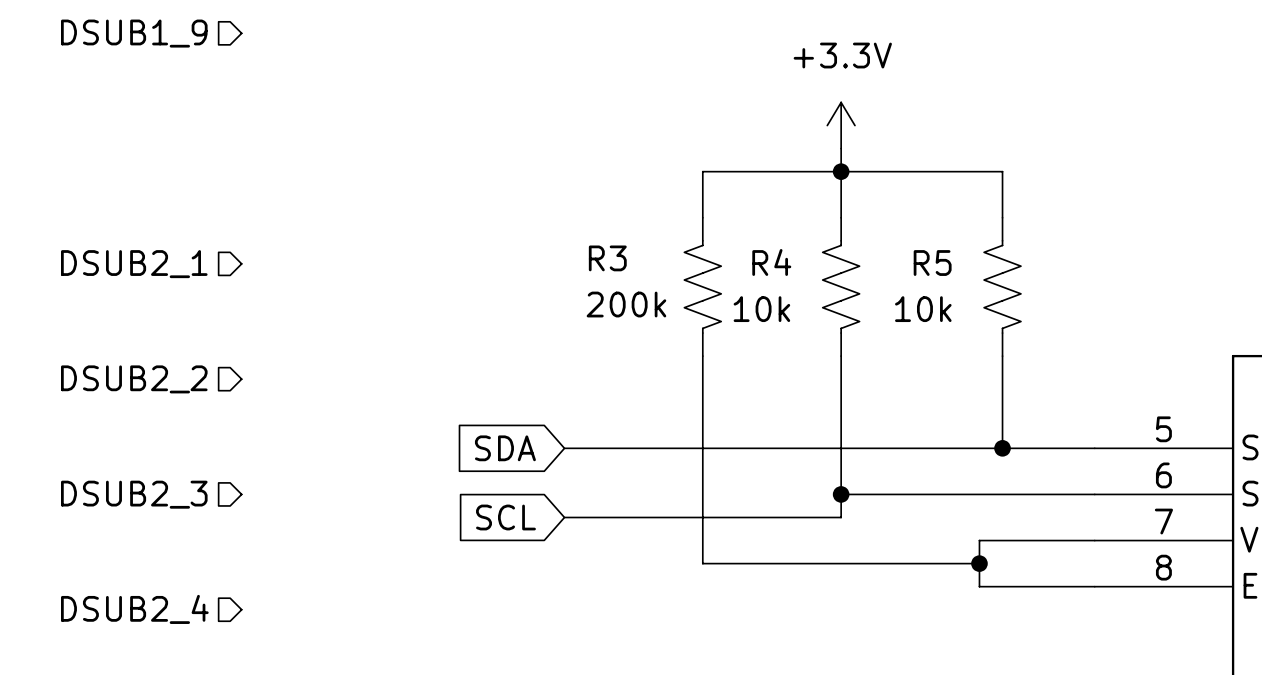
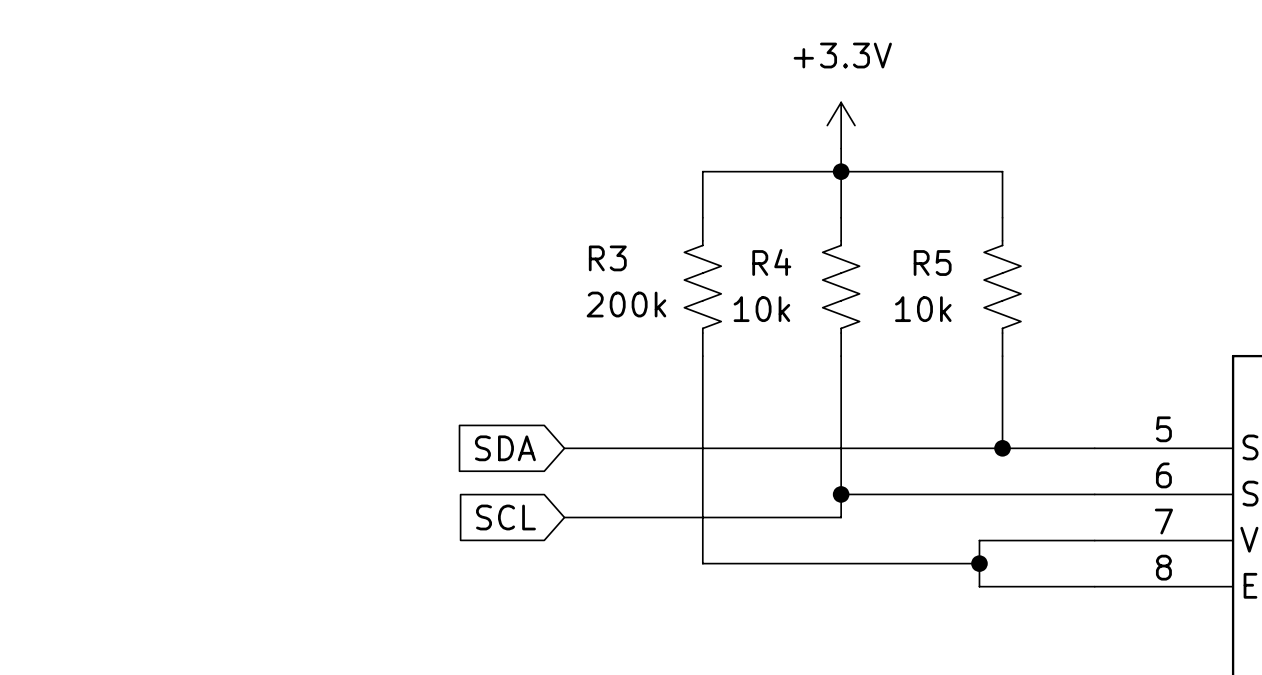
hierarchical label: DSUB1_9 (134, 33) -> none
hierarchical label: DSUB2_1 (134, 264) -> none
hierarchical label: DSUB2_2 (134, 379) -> none
hierarchical label: DSUB2_3 (134, 494) -> none
hierarchical label: DSUB2_4 (134, 609) -> none

